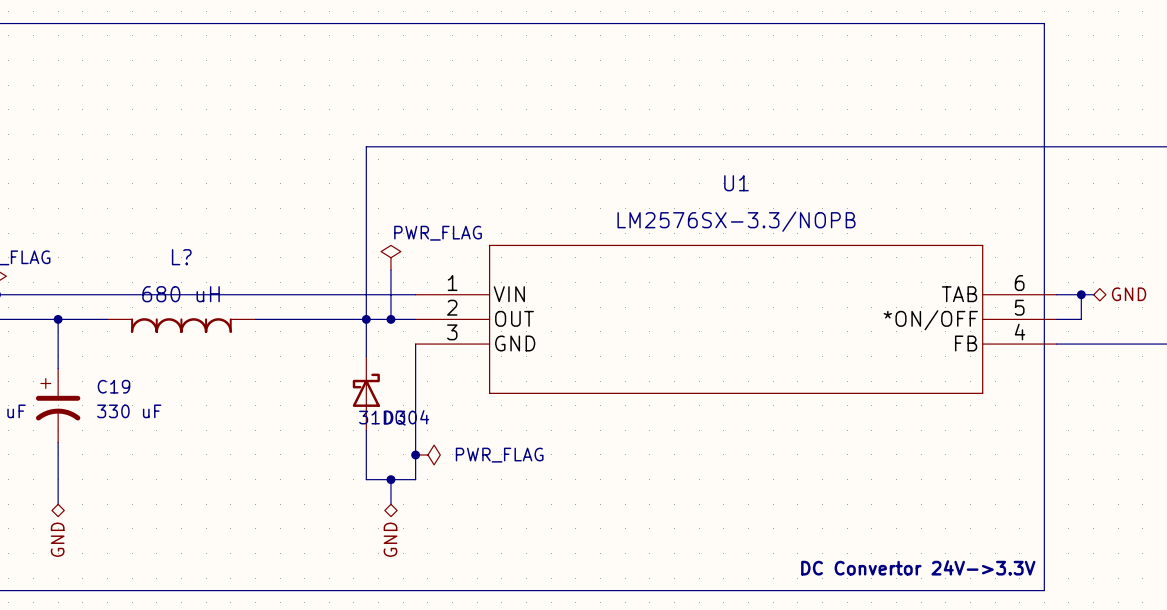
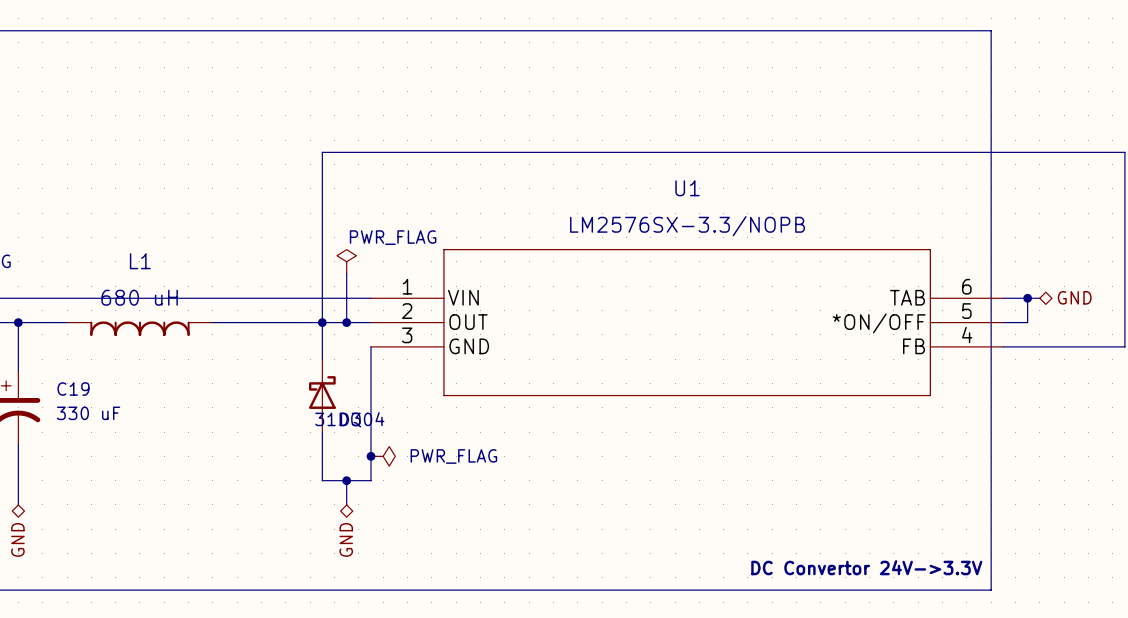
L? name: L? (181, 257) -> L1 (140, 261)

